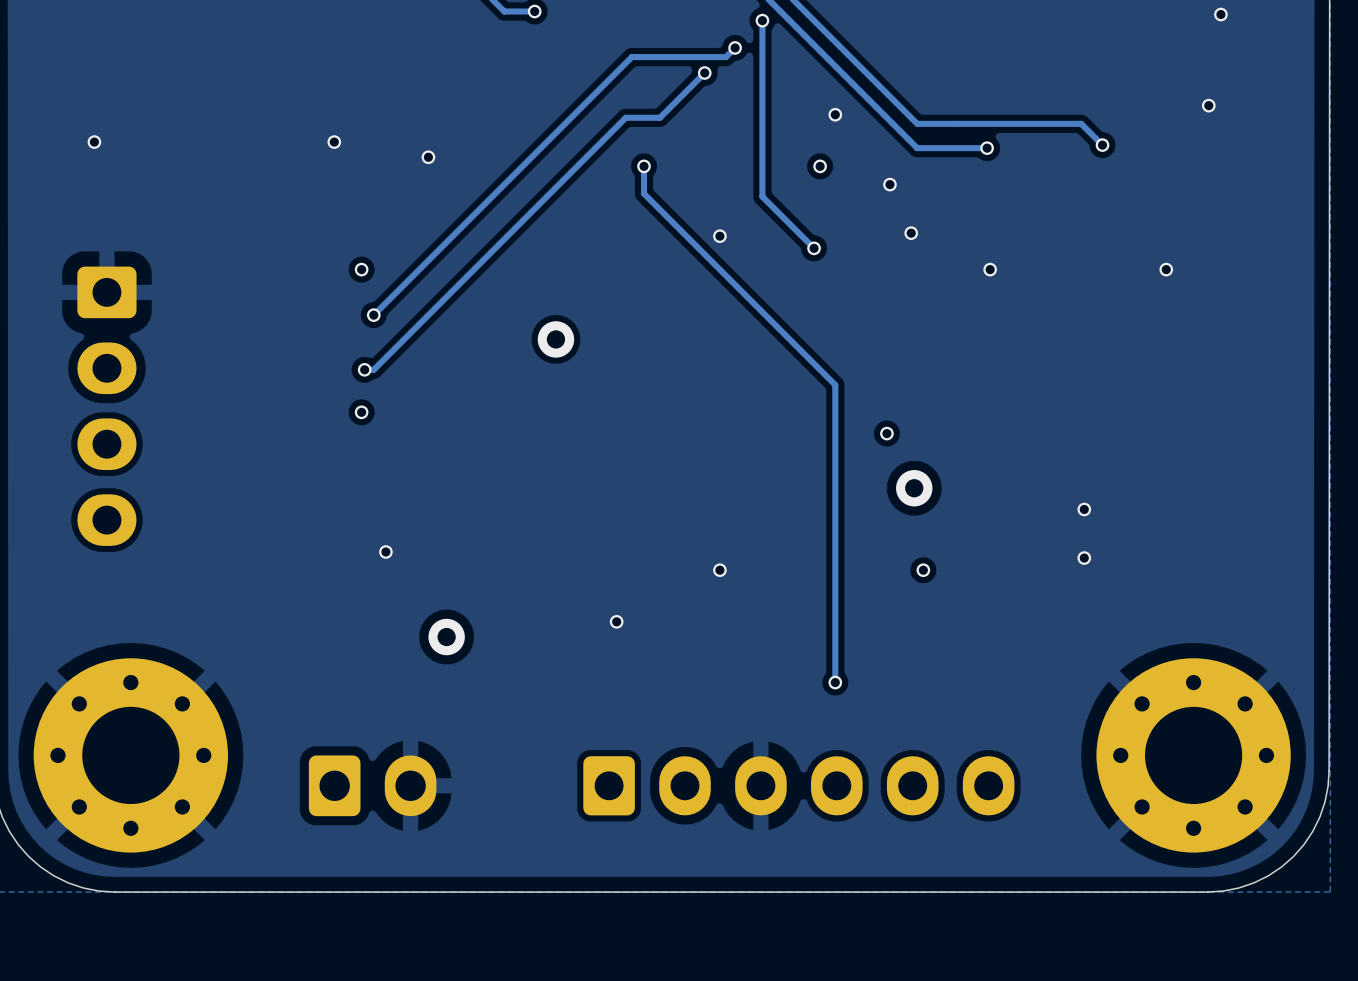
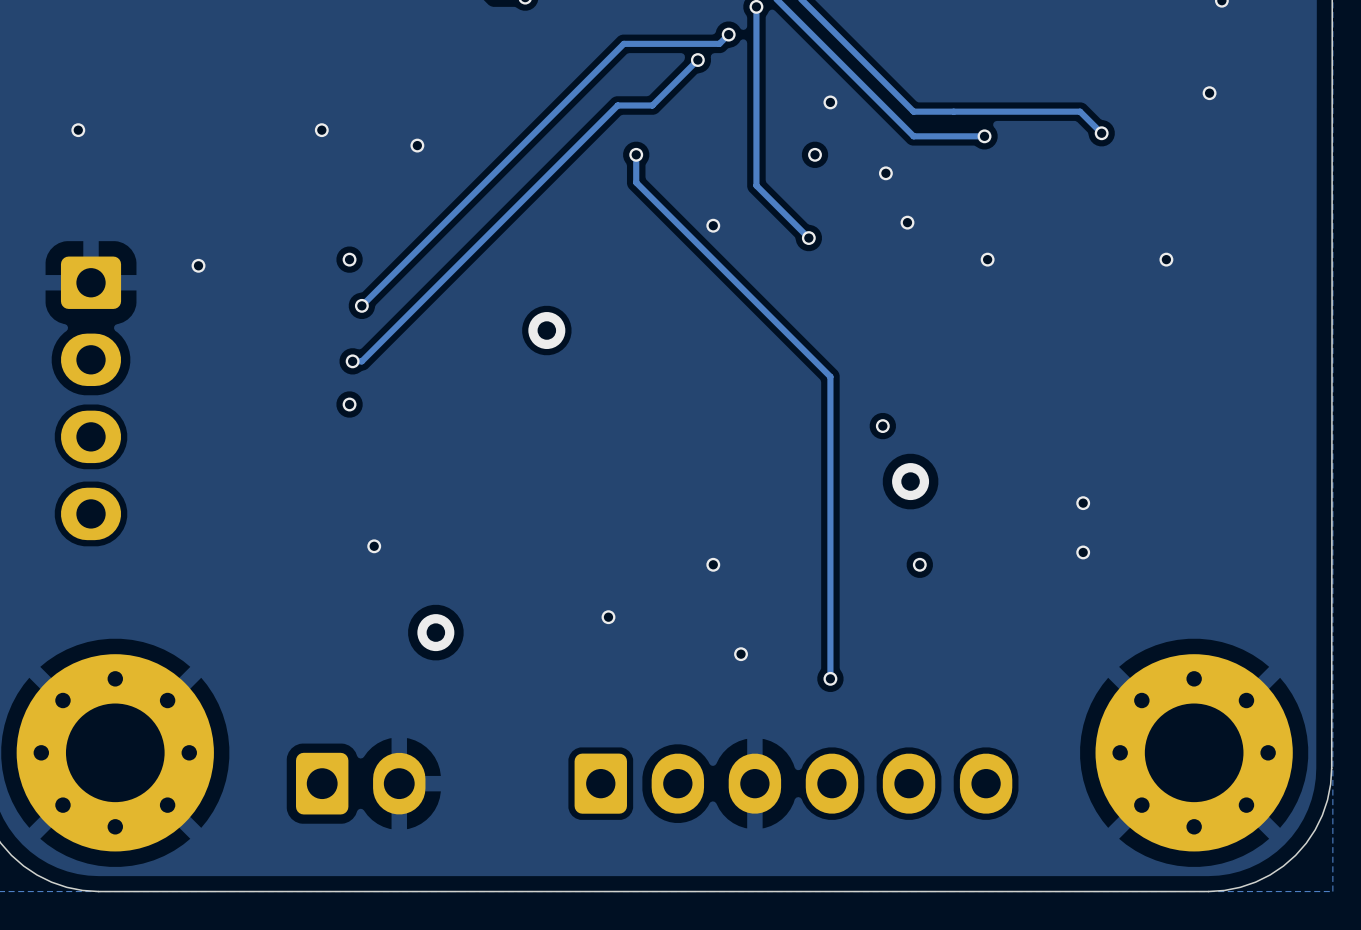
via: none -> (198, 265)
via: none -> (741, 654)

